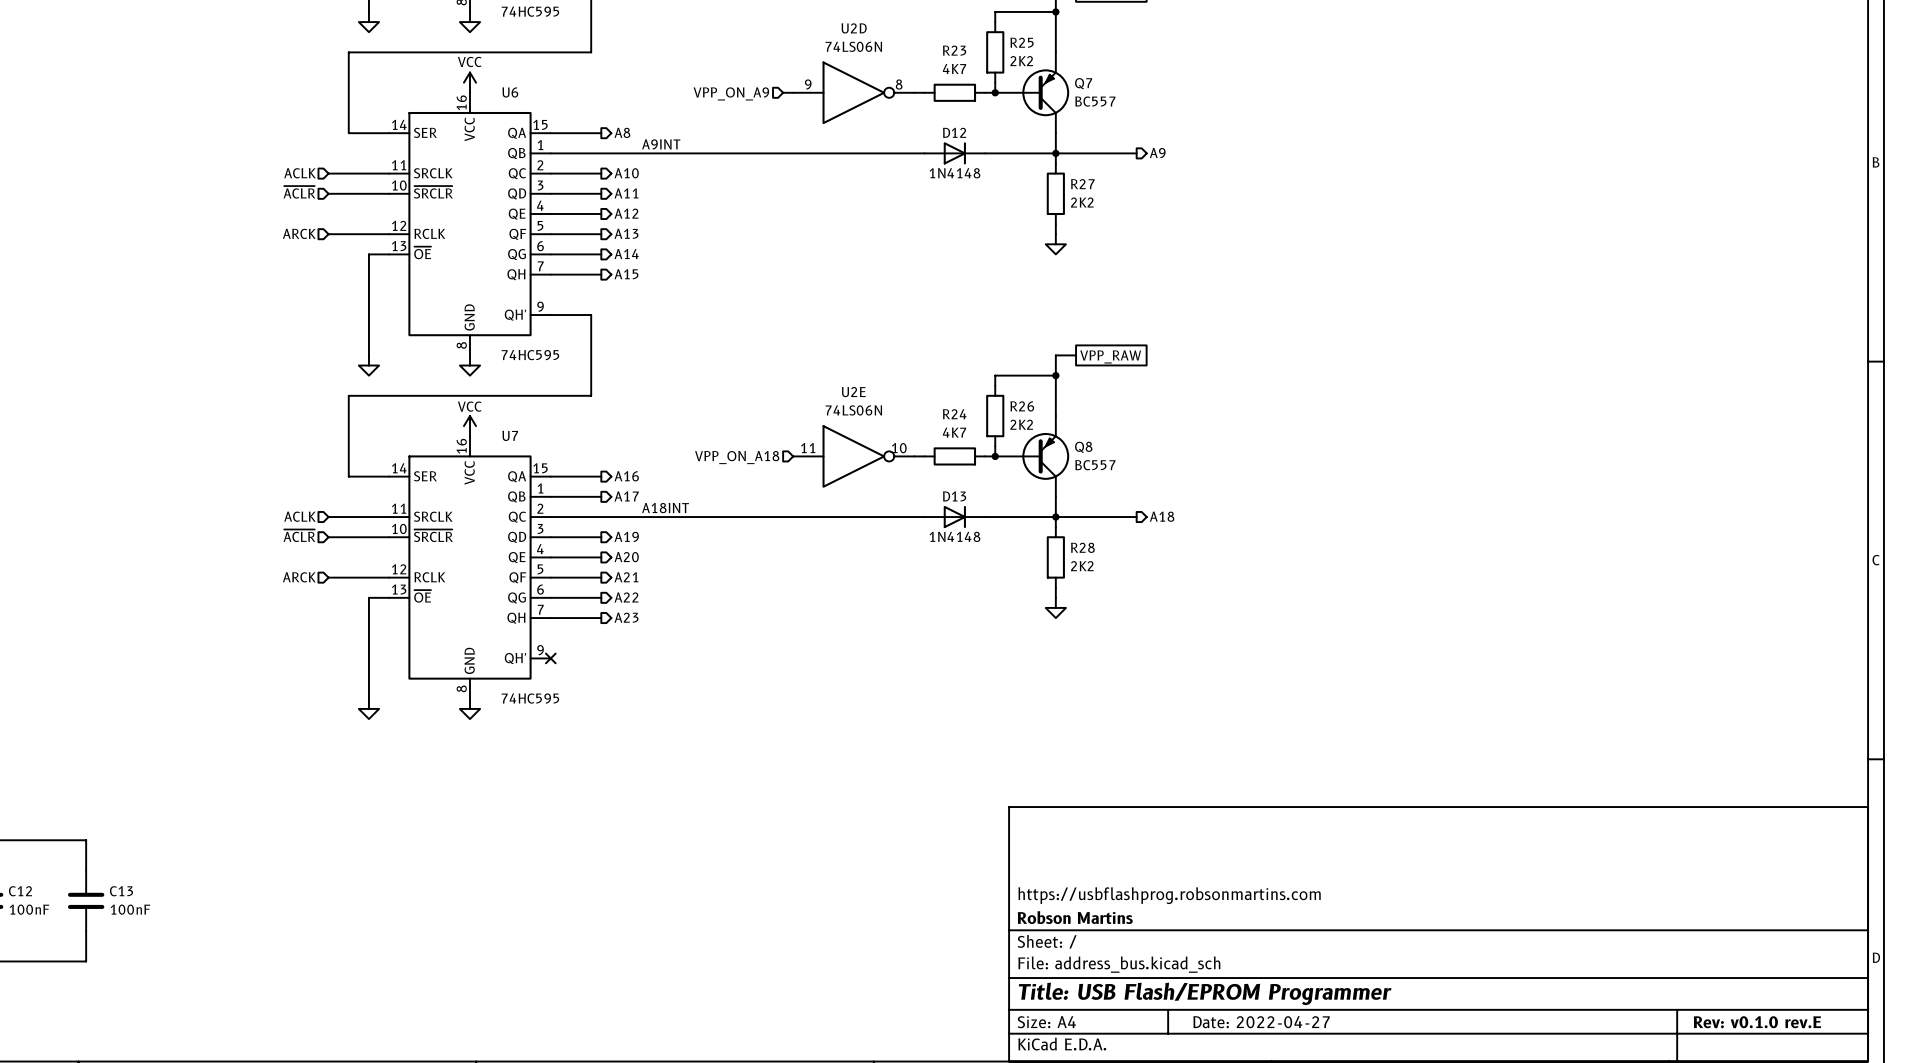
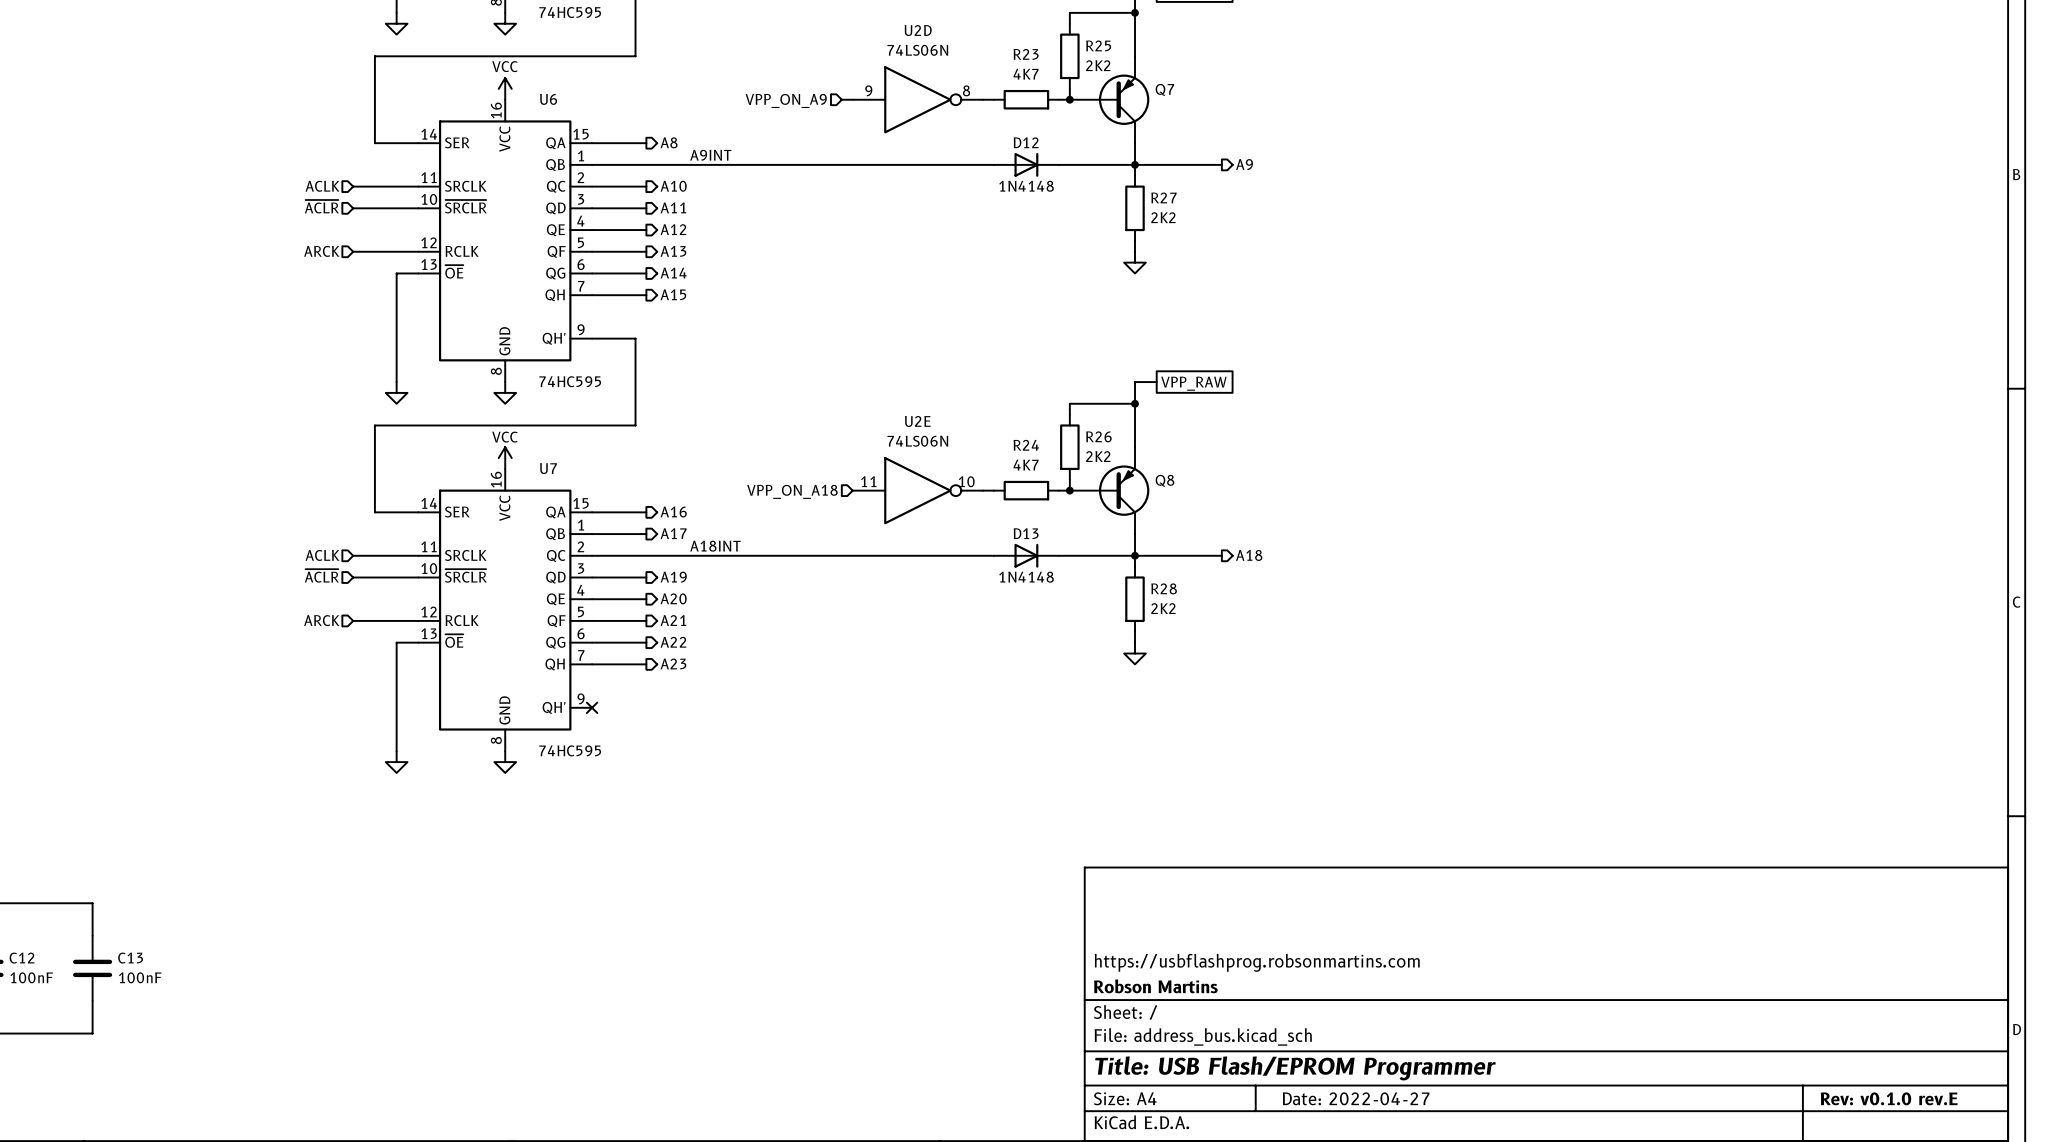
Q7 value: BC557 (1095, 101) -> none
Q8 value: BC557 (1095, 465) -> none

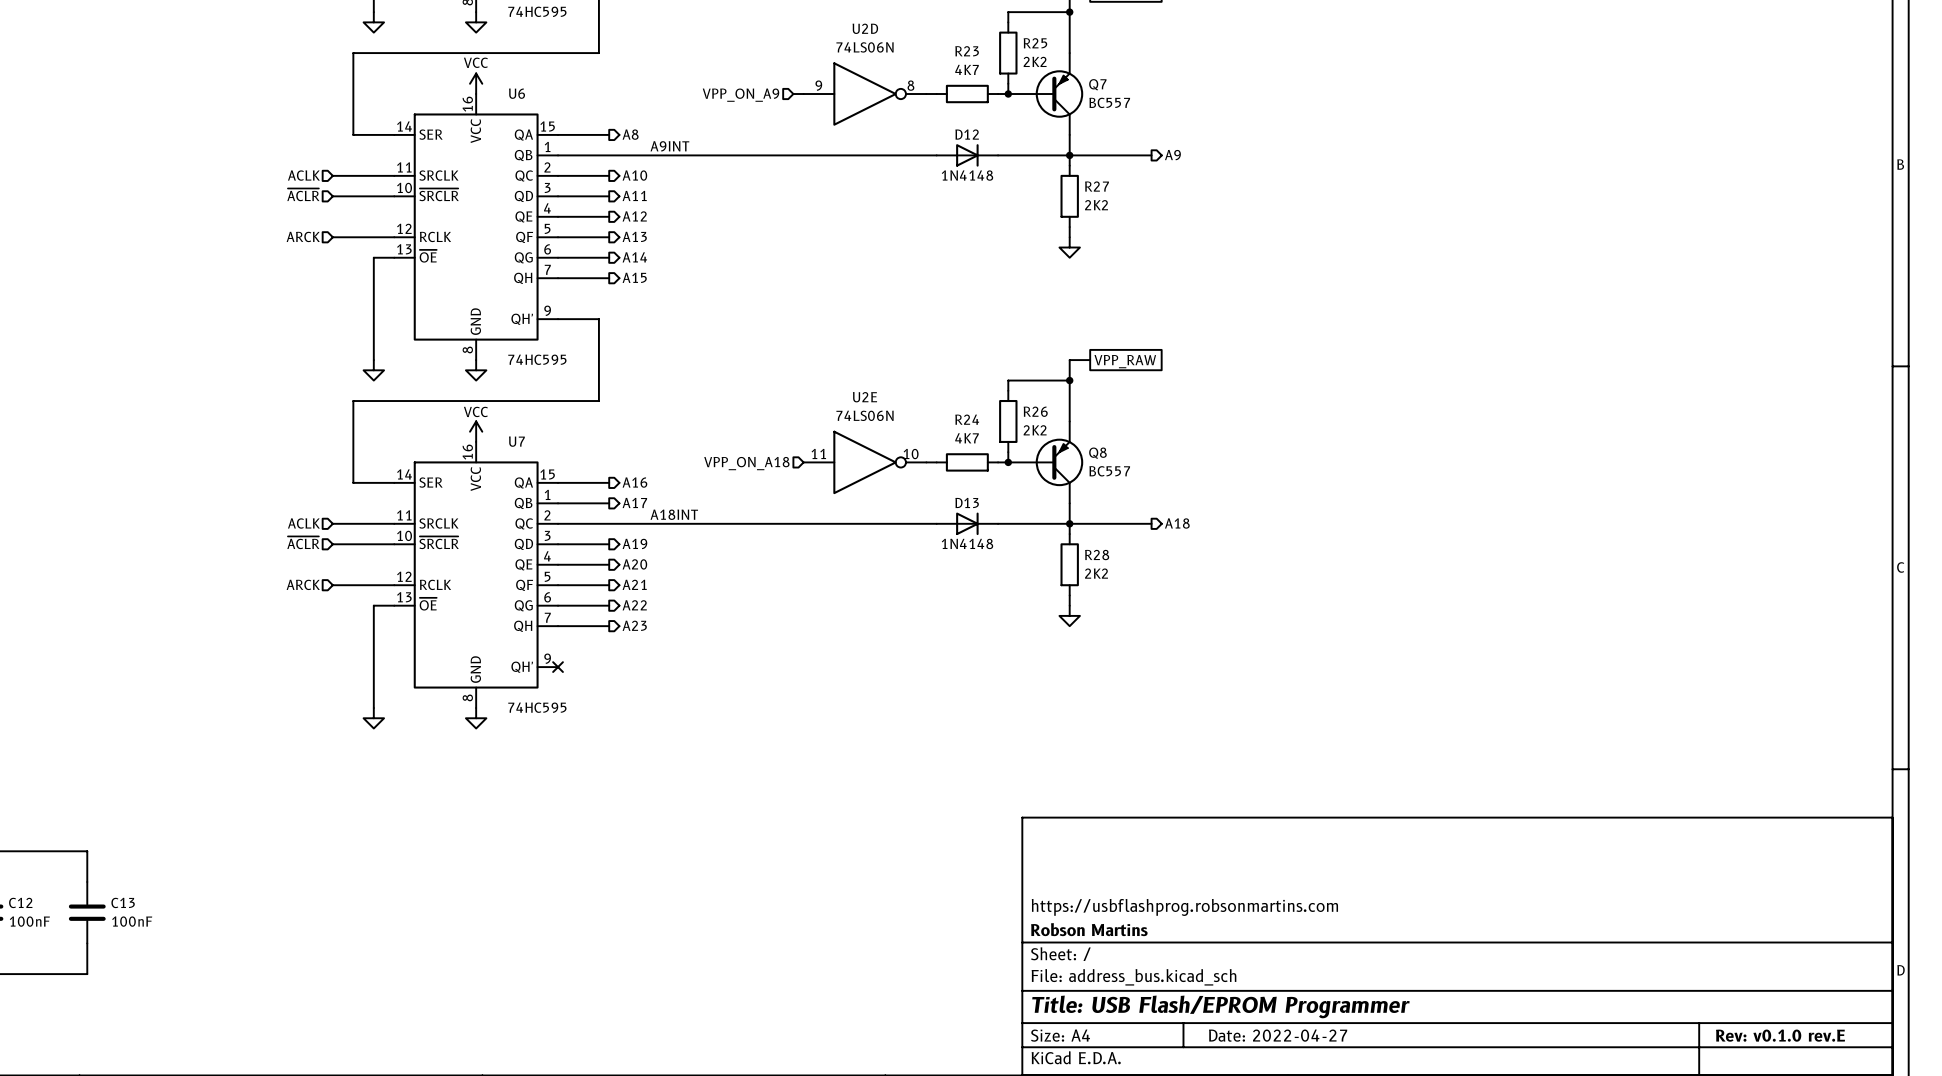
Q7 value: none -> BC557 (1109, 102)
Q8 value: none -> BC557 (1109, 471)

